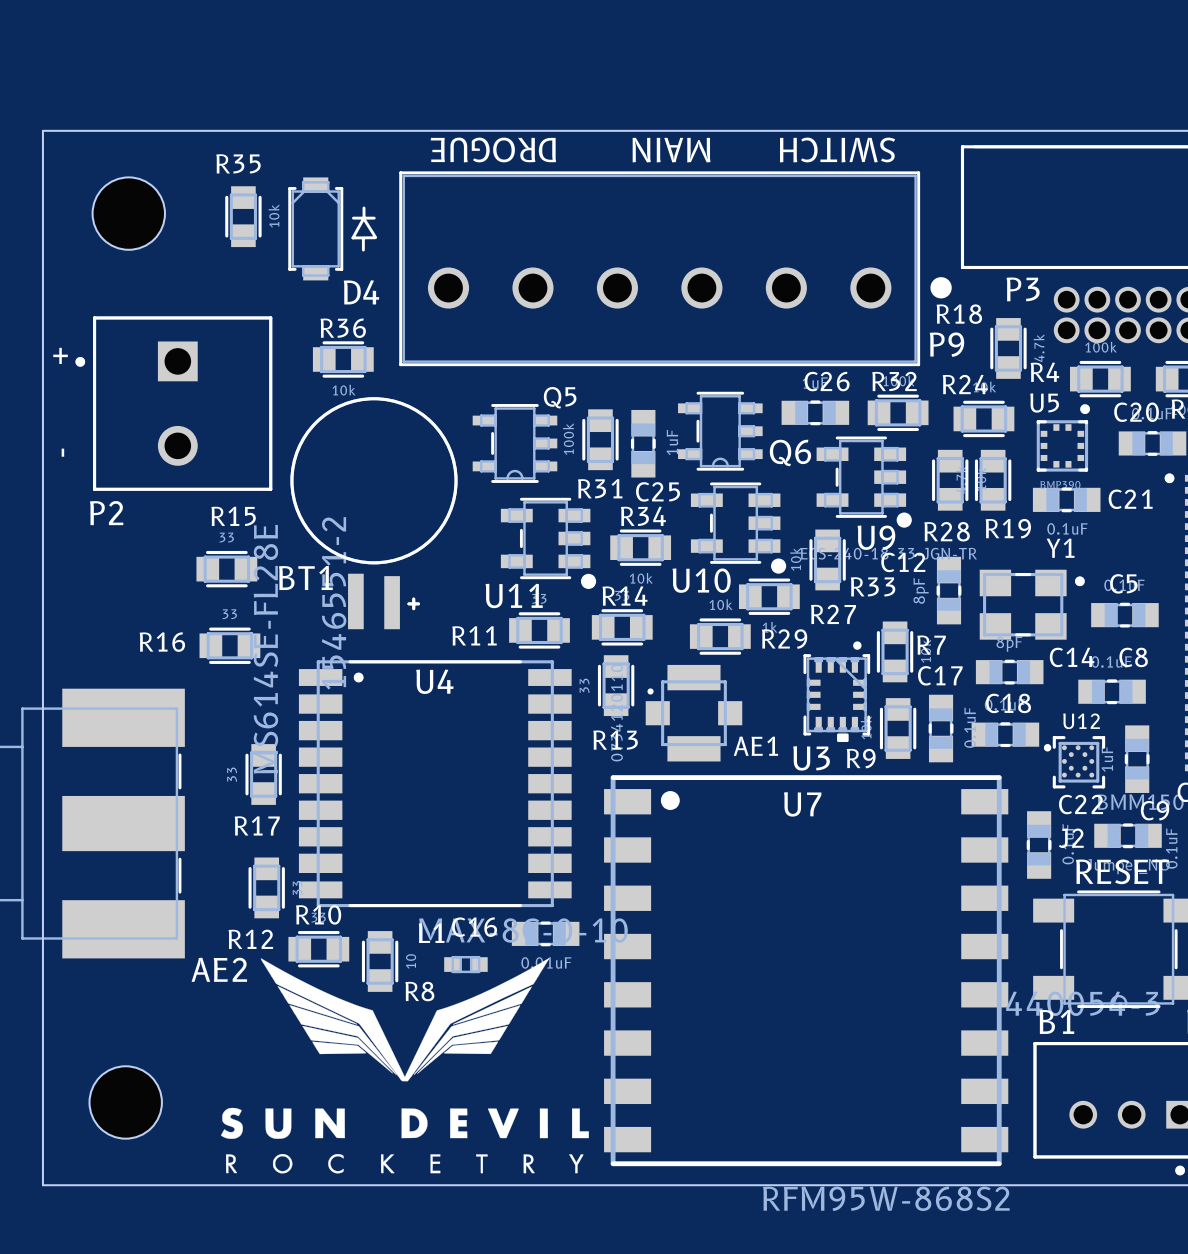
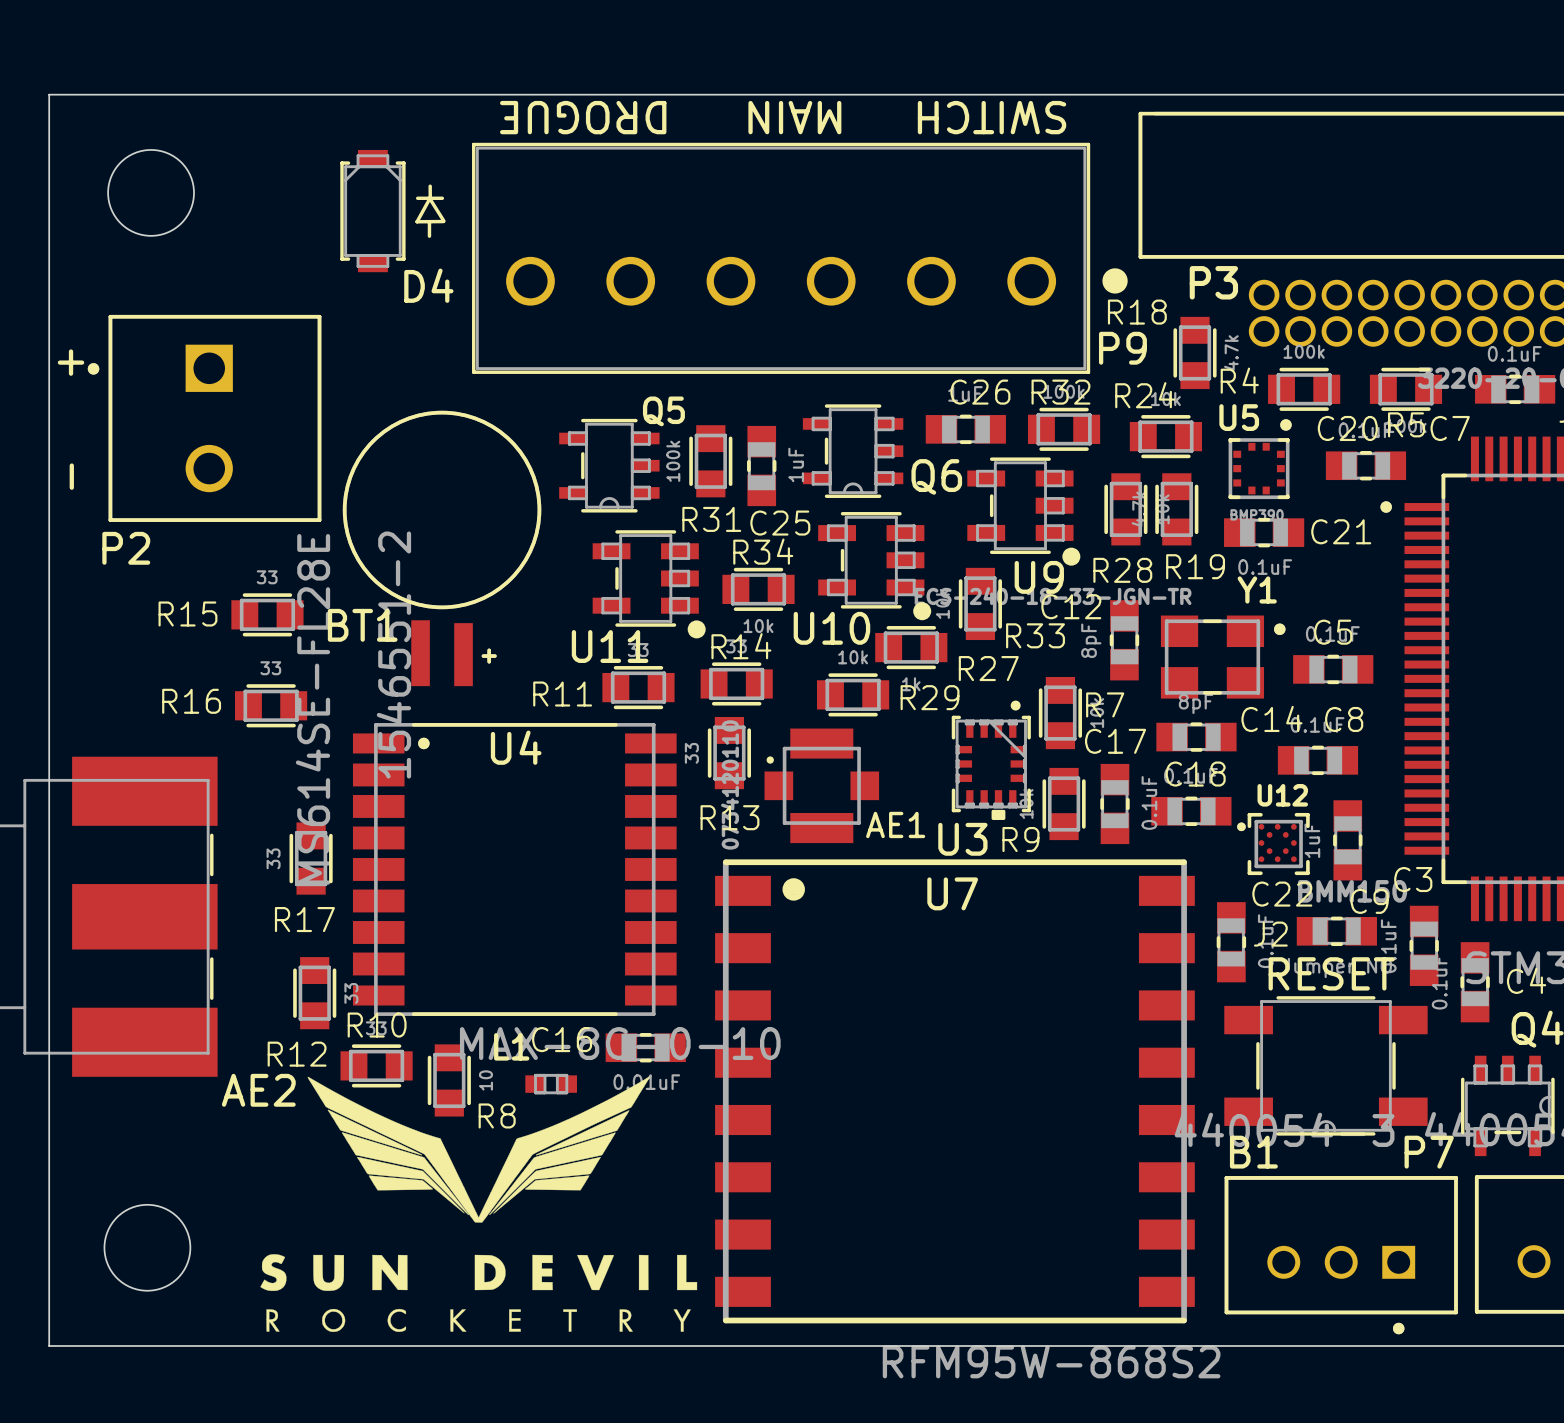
R35: 10k (243, 216) -> none
R36: 10k (343, 359) -> none
R15 name position: R15 (233, 516) -> R15 (187, 613)

